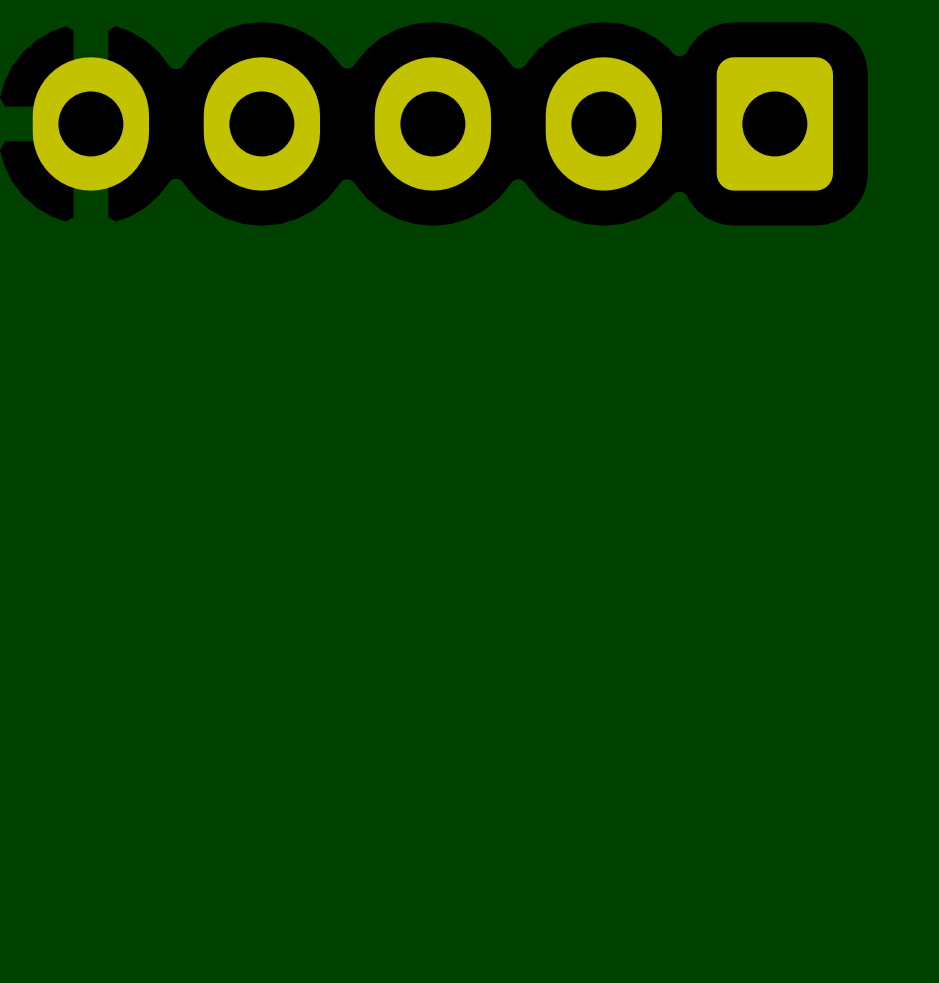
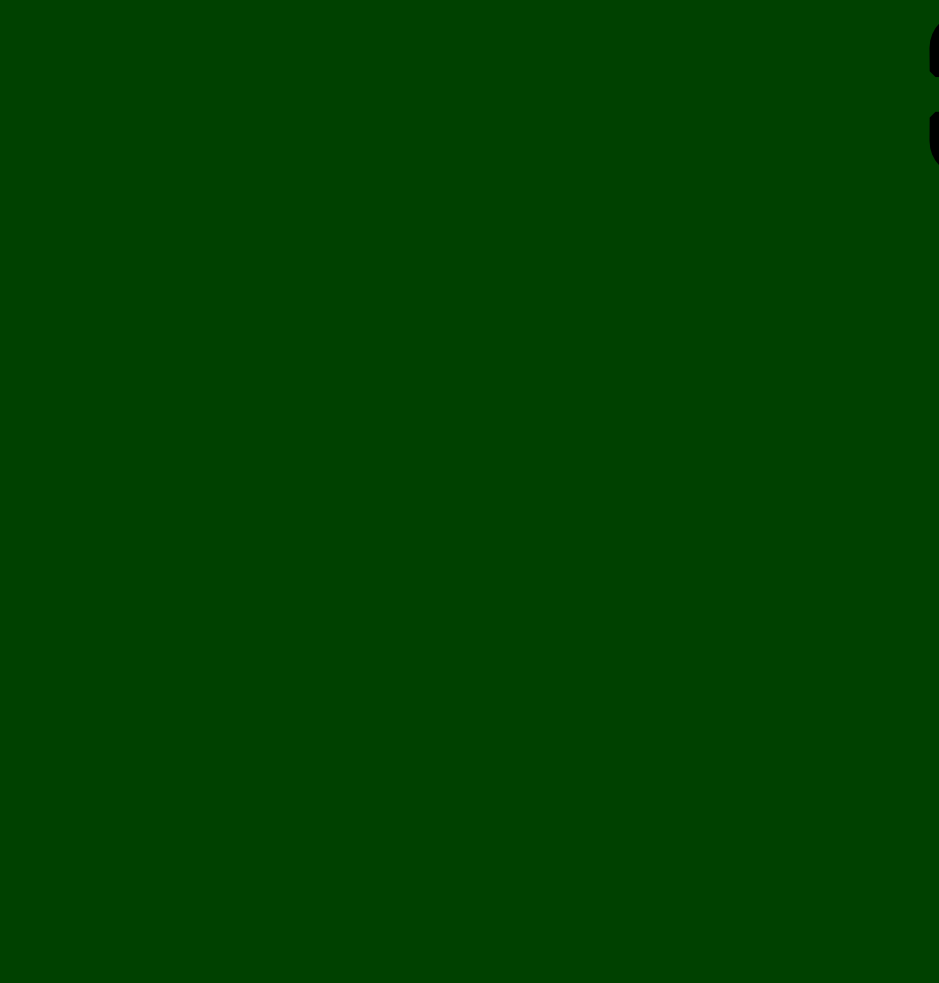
part: (432, 123) -> none

